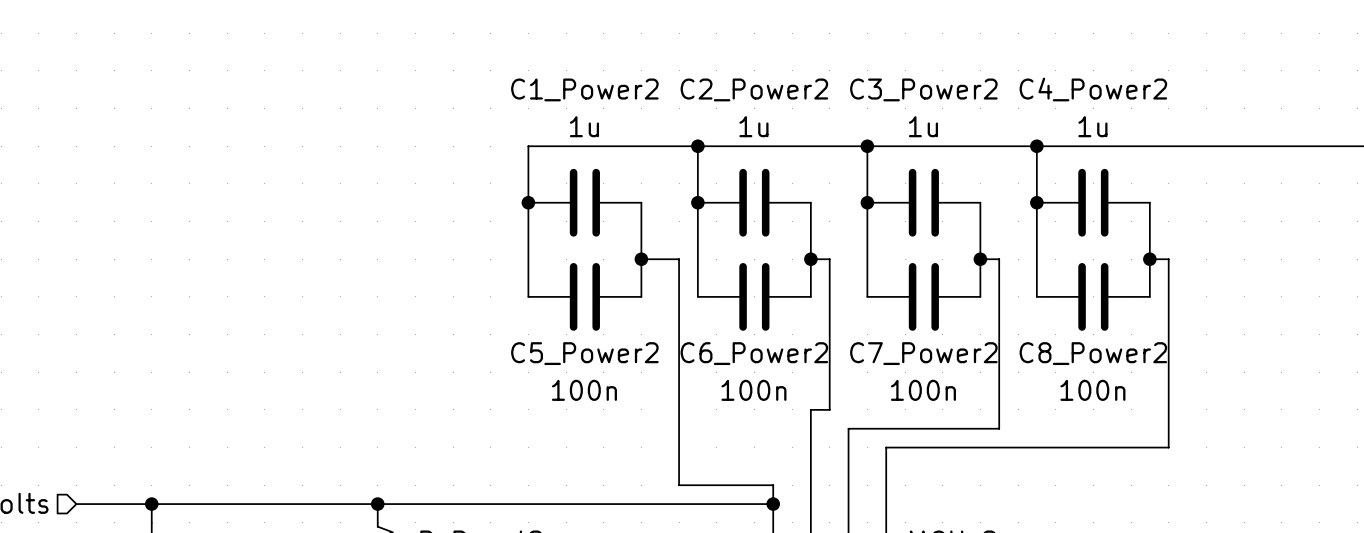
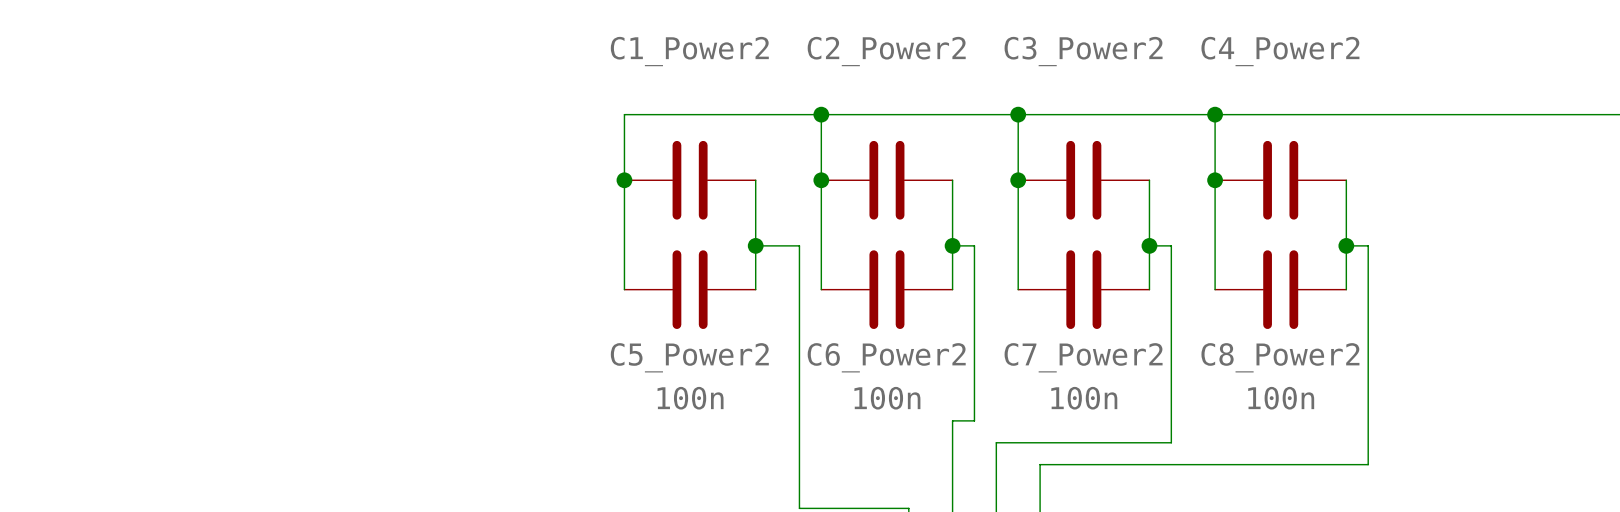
C1_Power2 value: 1u (584, 126) -> none
C2_Power2 value: 1u (753, 126) -> none
C3_Power2 value: 1u (923, 126) -> none
C4_Power2 value: 1u (1092, 126) -> none

